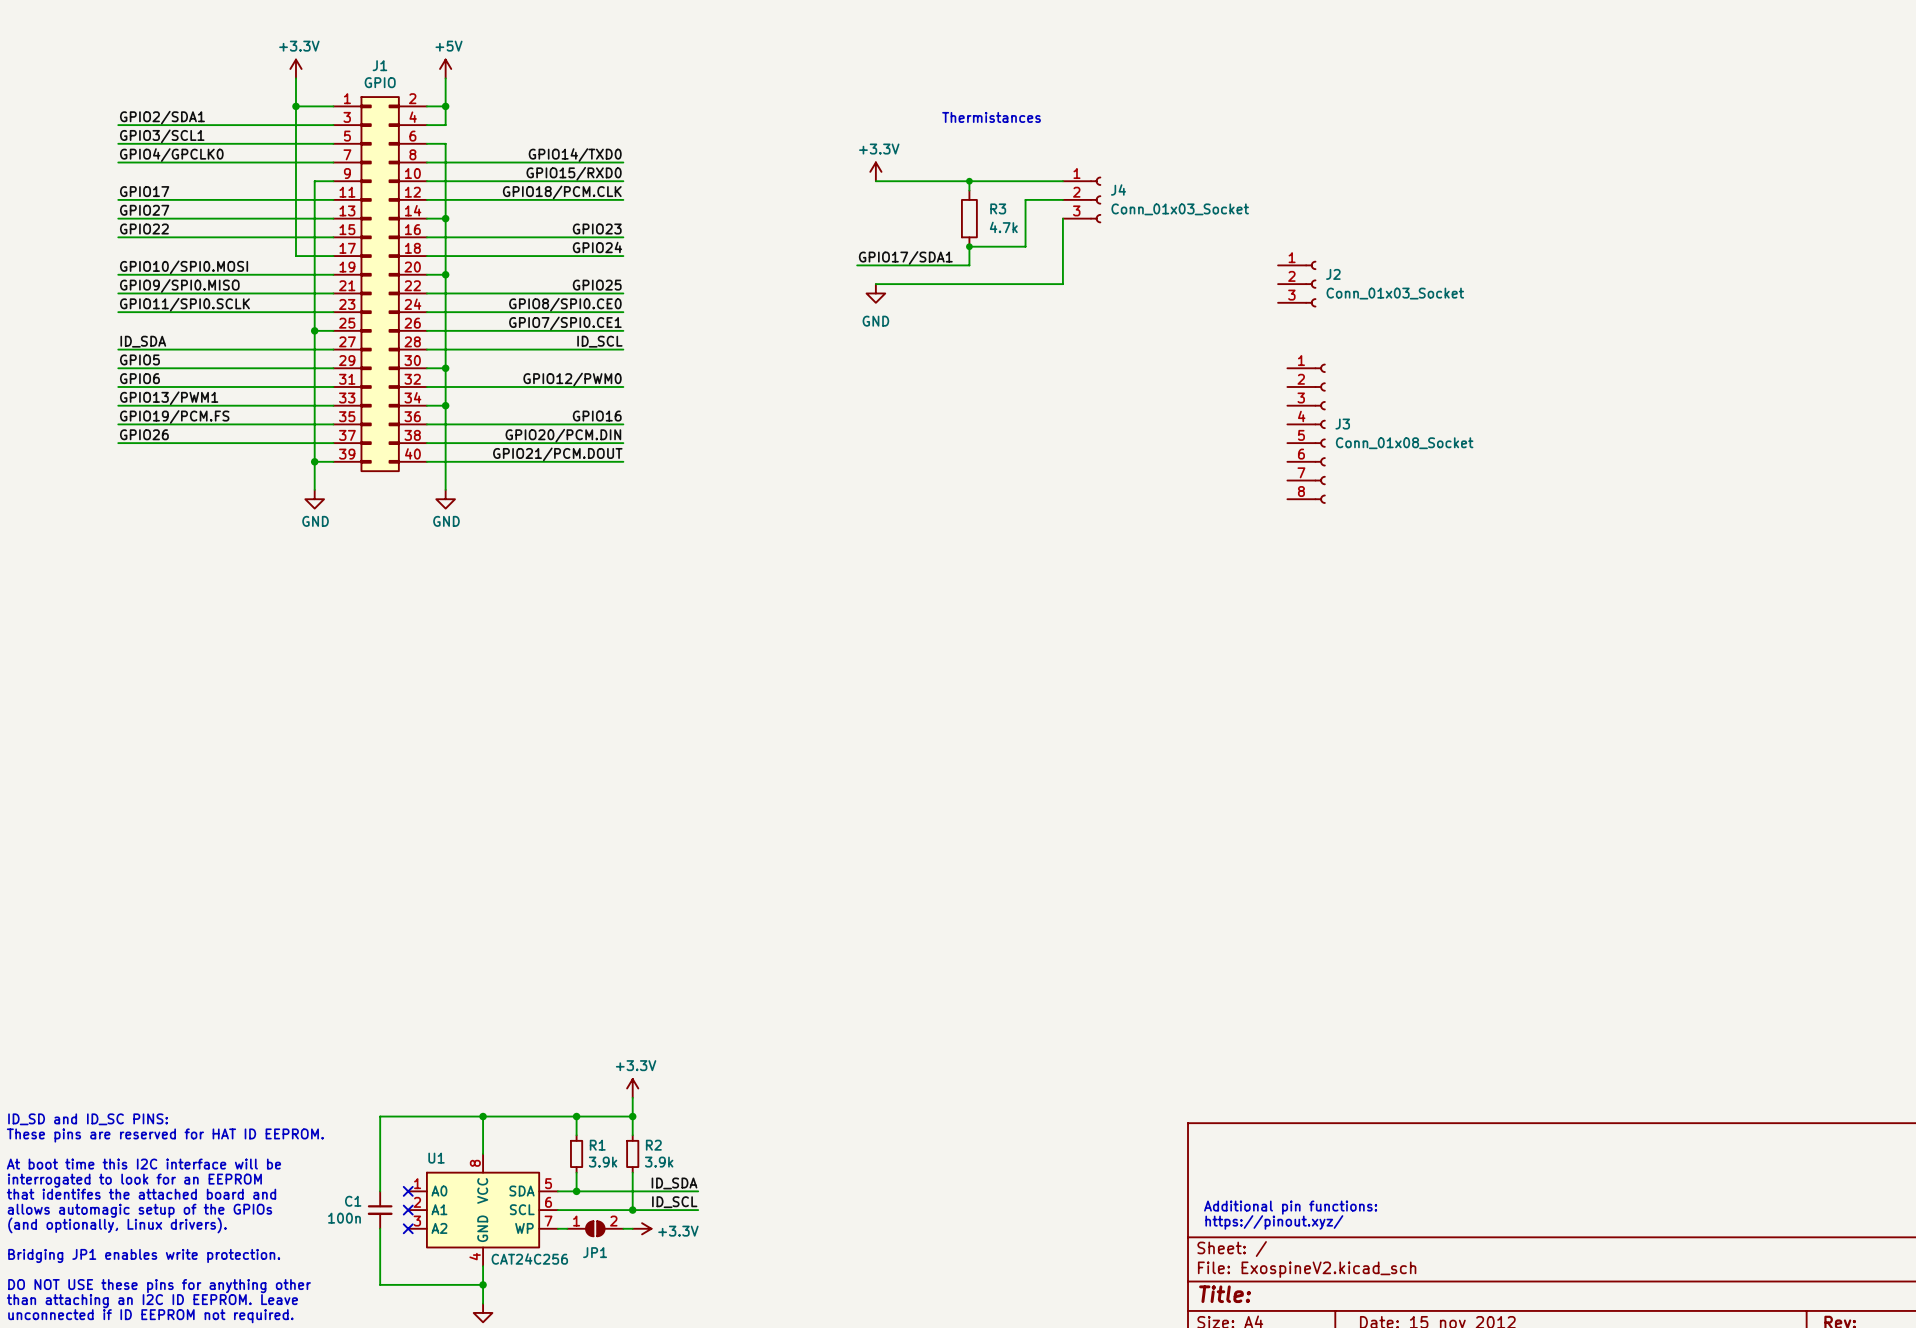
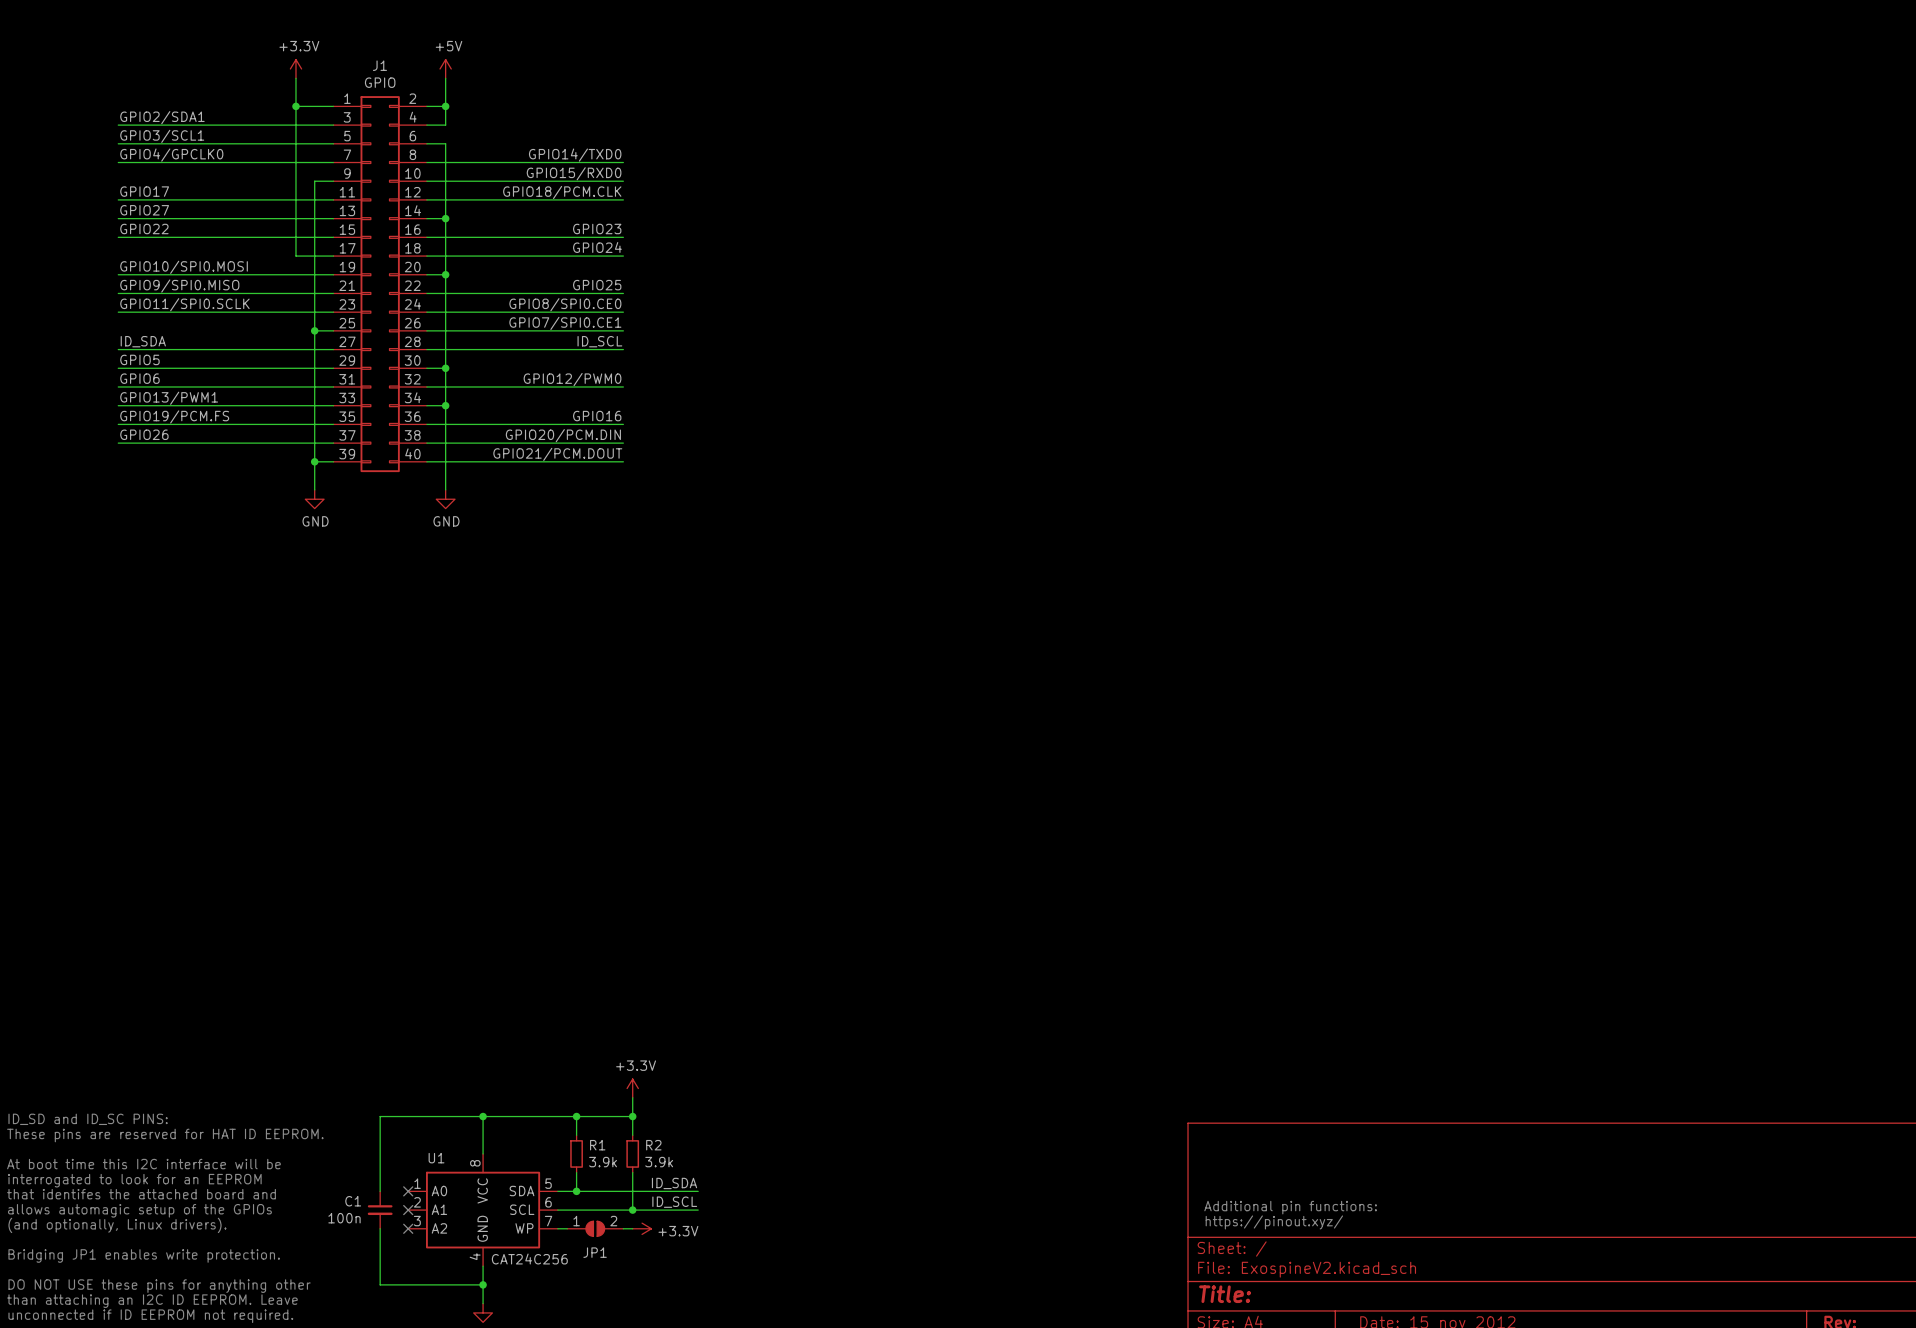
text: Thermistances (991, 117) -> none
power symbol: +3.3V (875, 171) -> none
wire: (875, 181) (1062, 181) -> none
wire: (969, 181) (969, 190) -> none
junction: (969, 181) -> none
wire: (1062, 199) (1025, 199) (1025, 246) (969, 246) (969, 265) (857, 265) -> none
J4: Conn_01x03_Socket (1081, 199) -> none
R3: 4.7k (969, 218) -> none
wire: (1062, 218) (1062, 284) (875, 284) -> none
junction: (969, 246) -> none
label: GPIO17/SDA1 (905, 257) -> none
J2: Conn_01x03_Socket (1297, 284) -> none
power symbol: GND (875, 293) -> none
J3: Conn_01x08_Socket (1306, 433) -> none

